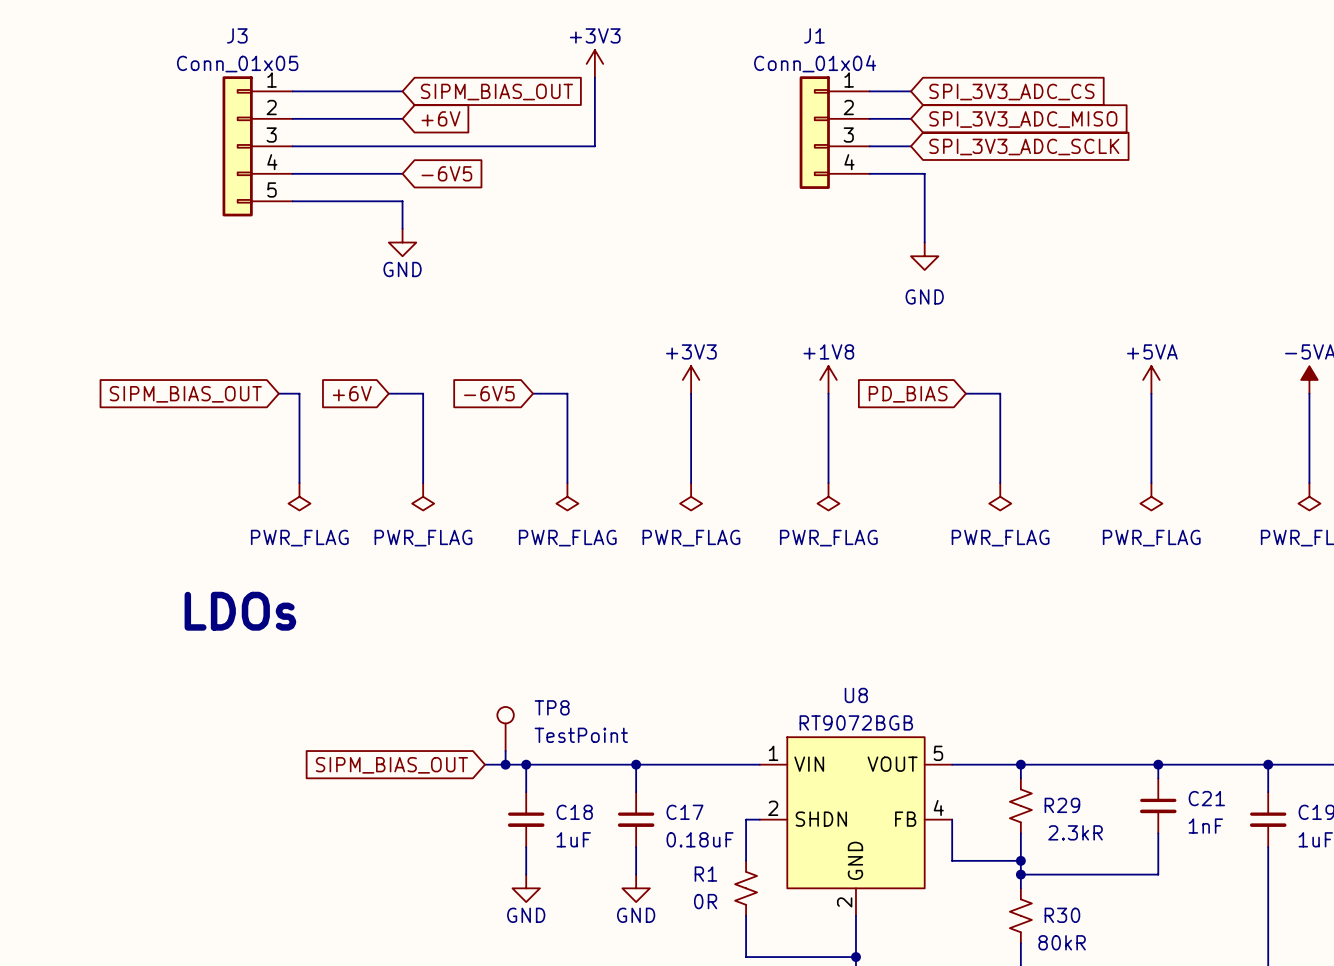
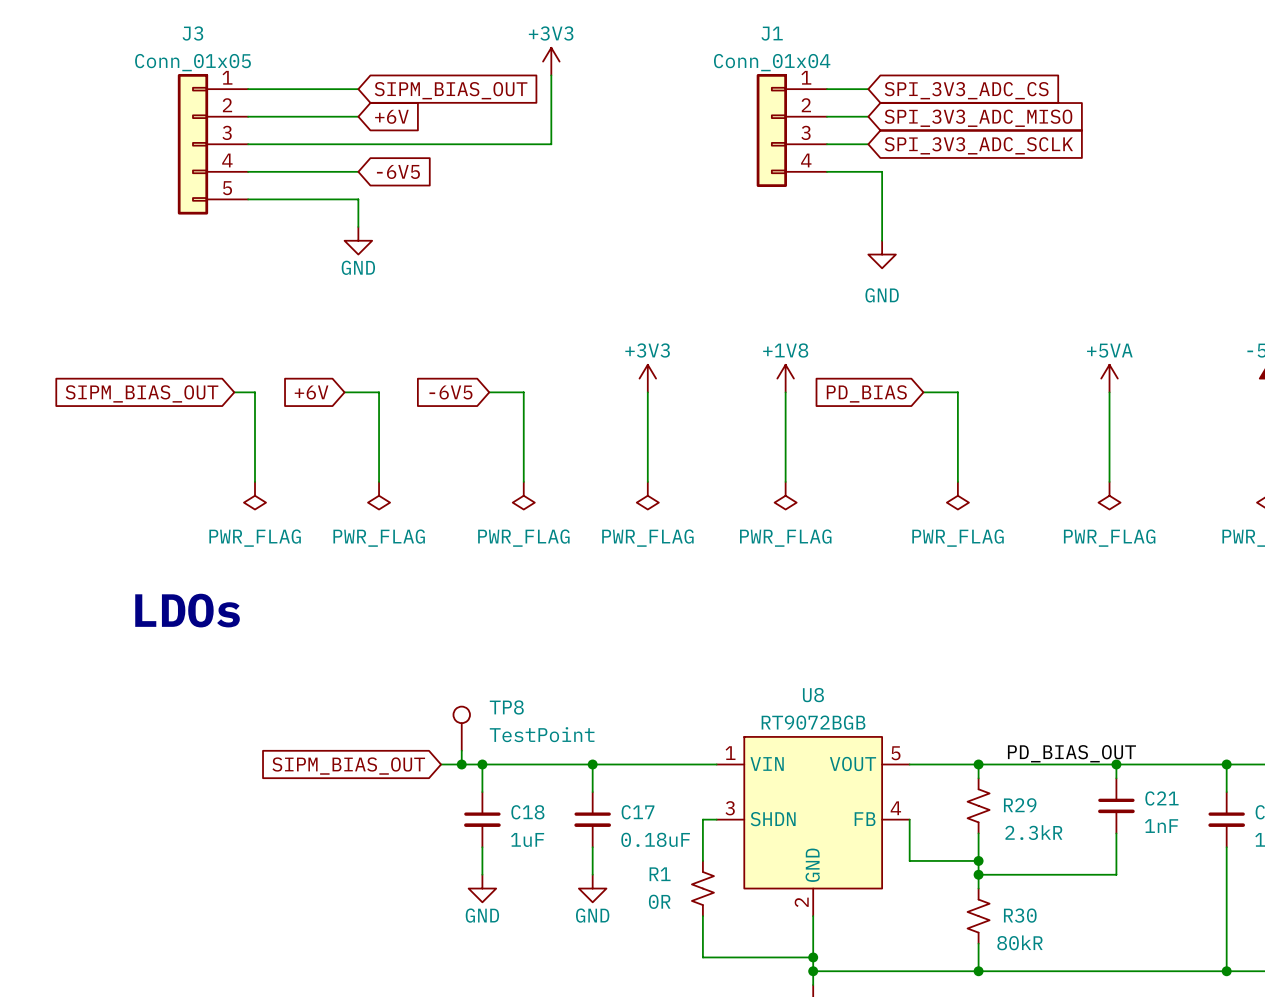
label: none -> PD_BIAS_OUT (1071, 753)
U8 pin number: 2 (773, 808) -> 3 (730, 808)

